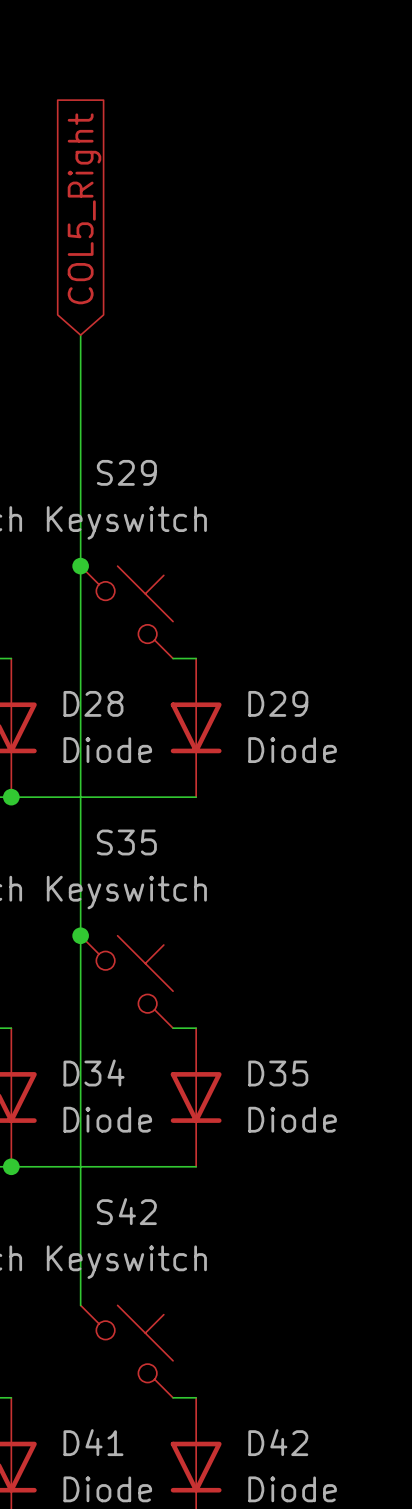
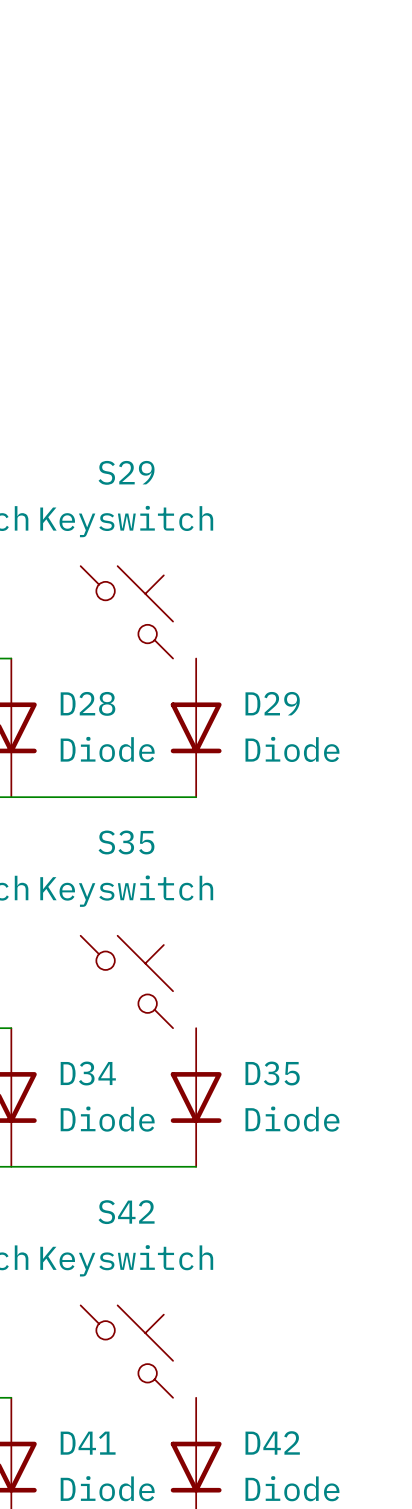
global label: COL5_Right (84, 208) -> none
wire: (80, 335) (80, 1305) -> none
junction: (80, 566) -> none
wire: (173, 658) (196, 658) -> none
junction: (11, 797) -> none
junction: (80, 935) -> none
wire: (173, 1028) (196, 1028) -> none
junction: (11, 1166) -> none
wire: (173, 1397) (196, 1397) -> none

